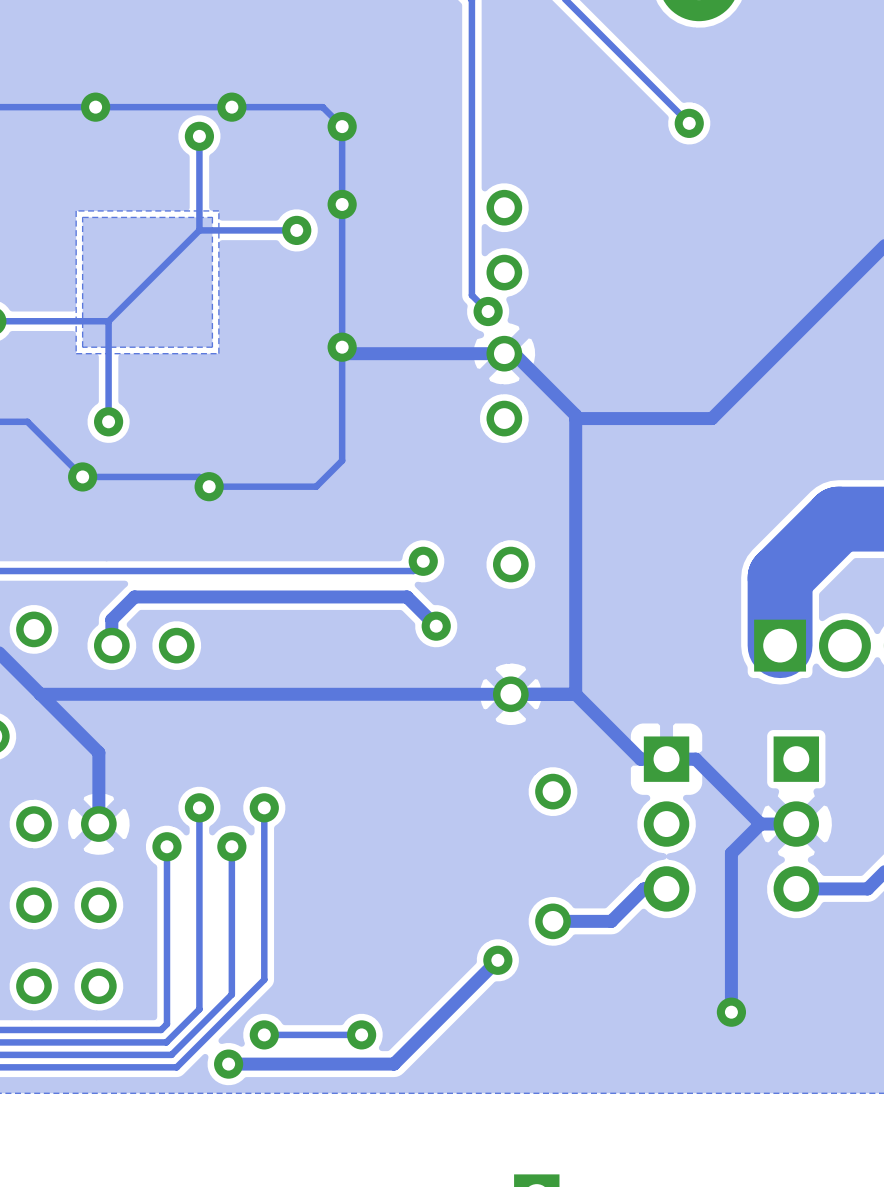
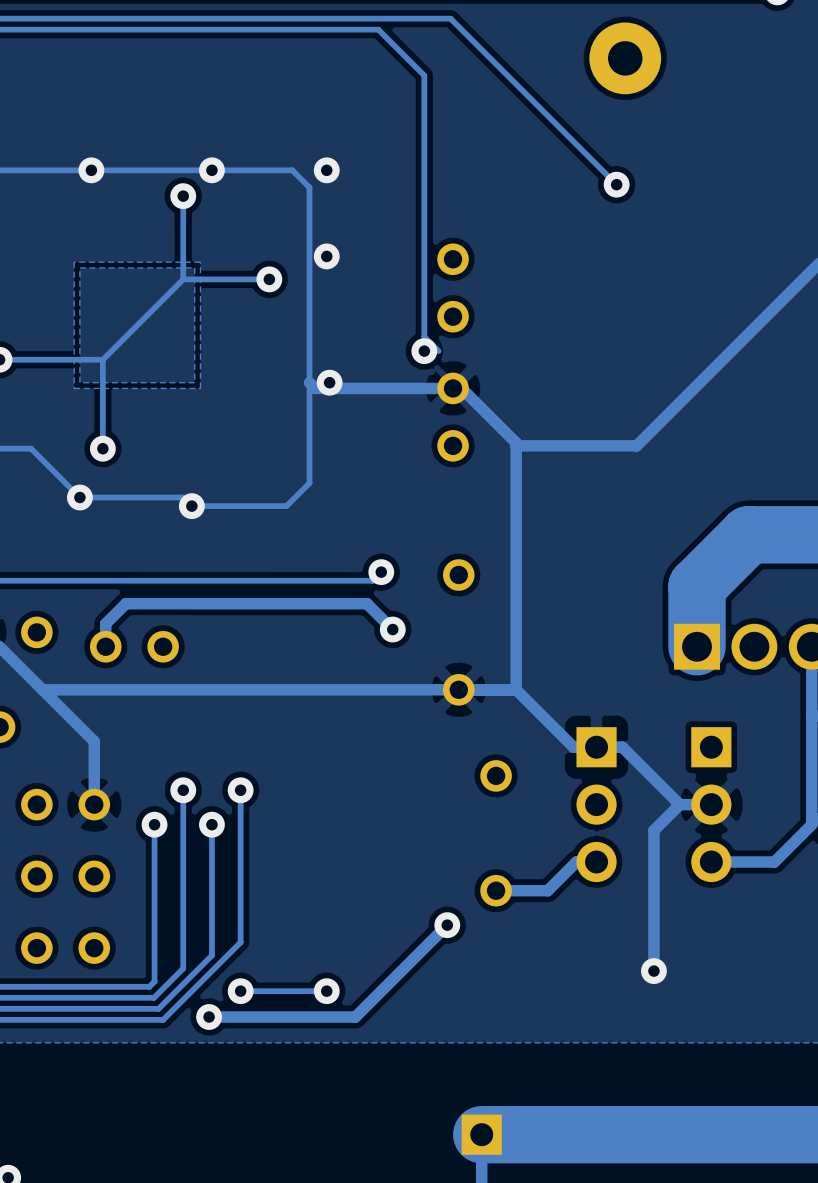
via position: (342, 126) -> (326, 170)
via position: (342, 204) -> (326, 256)
via position: (488, 311) -> (424, 351)
via position: (342, 347) -> (329, 382)

